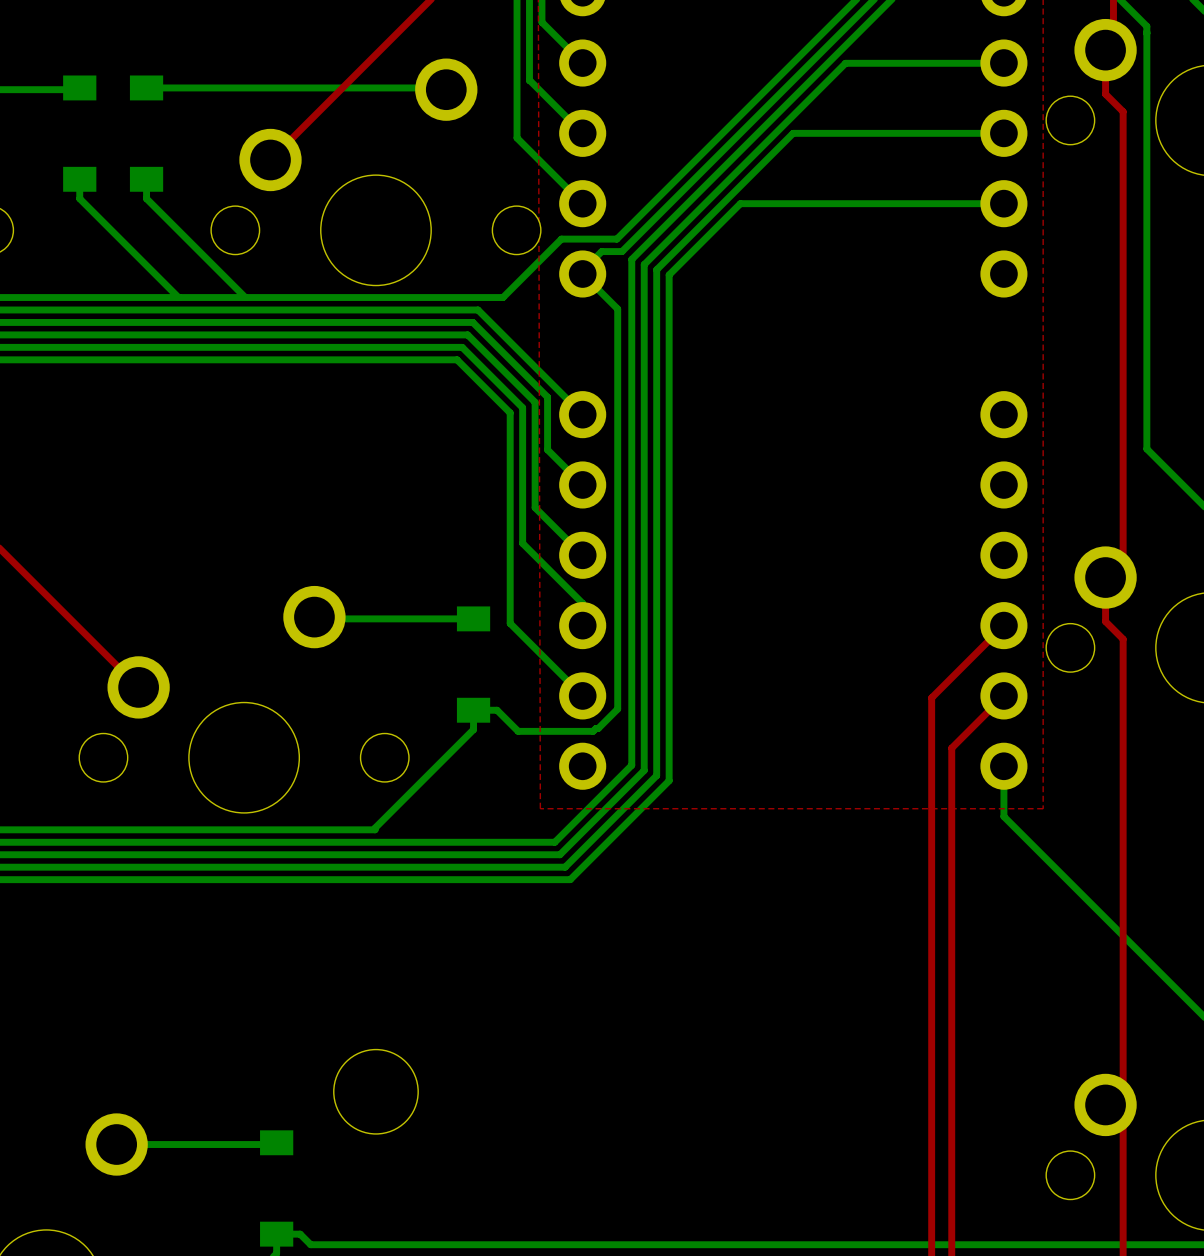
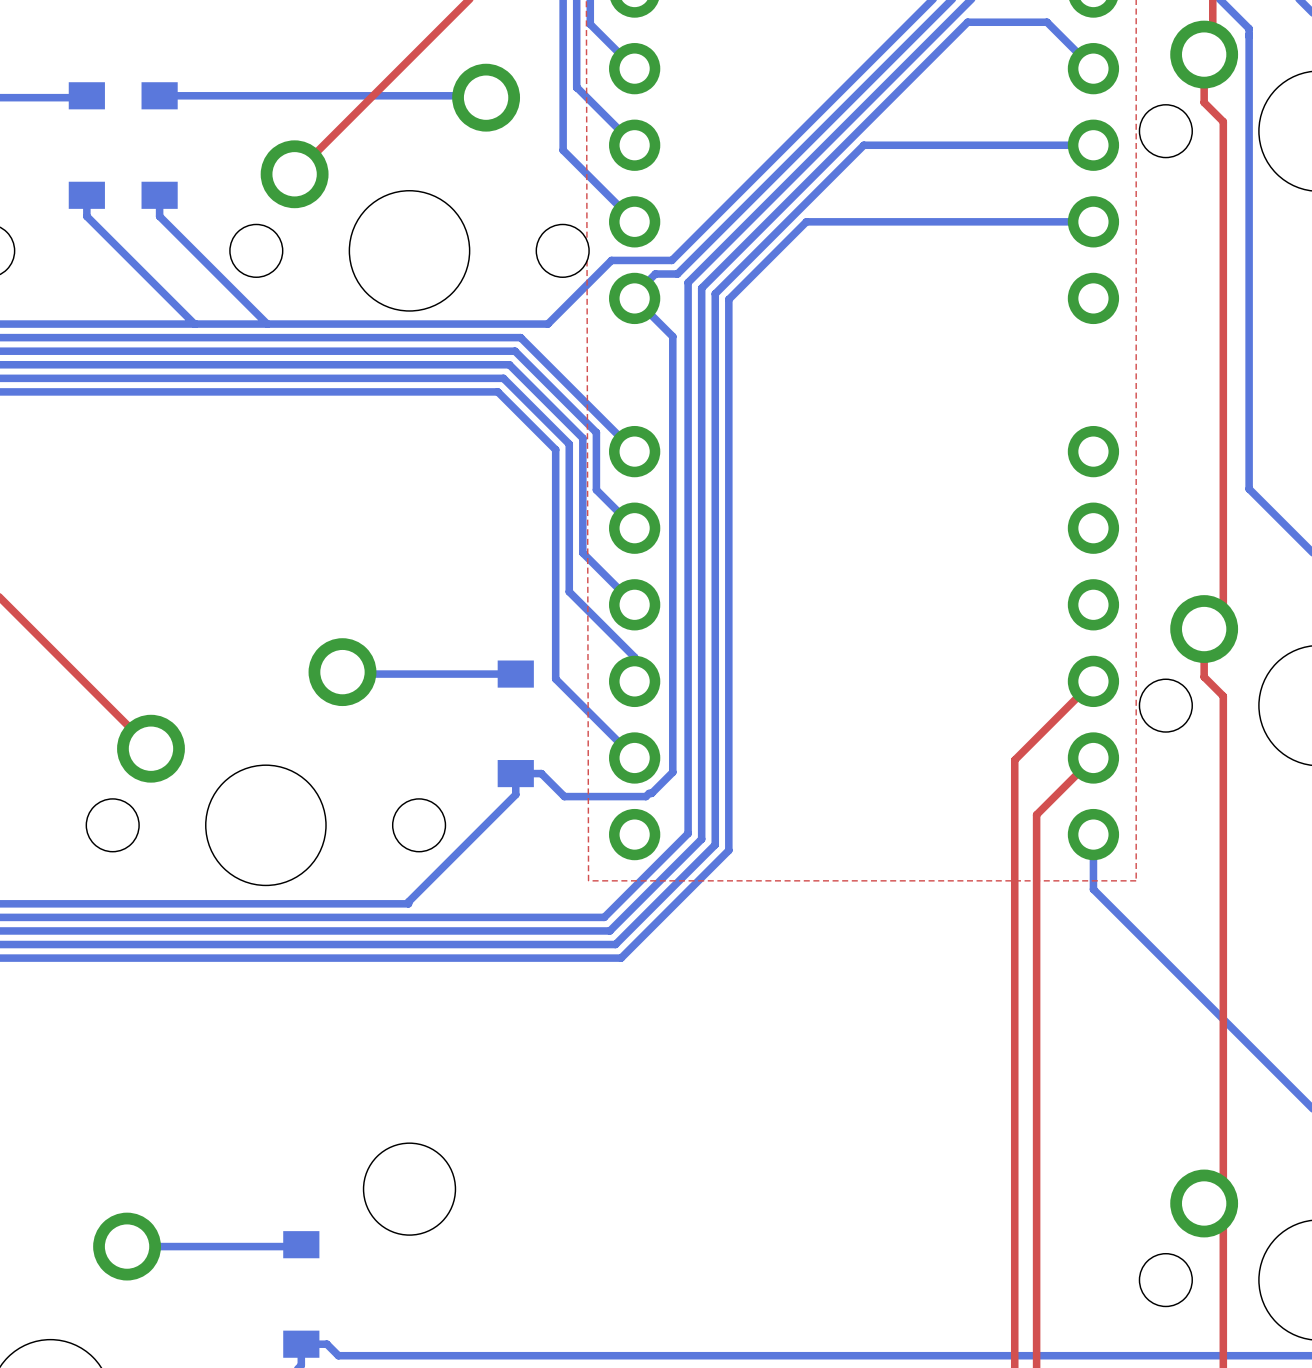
bottom track: (845, 63) (1003, 63) -> (920, 68) (967, 22) (1047, 22) (1093, 68)

